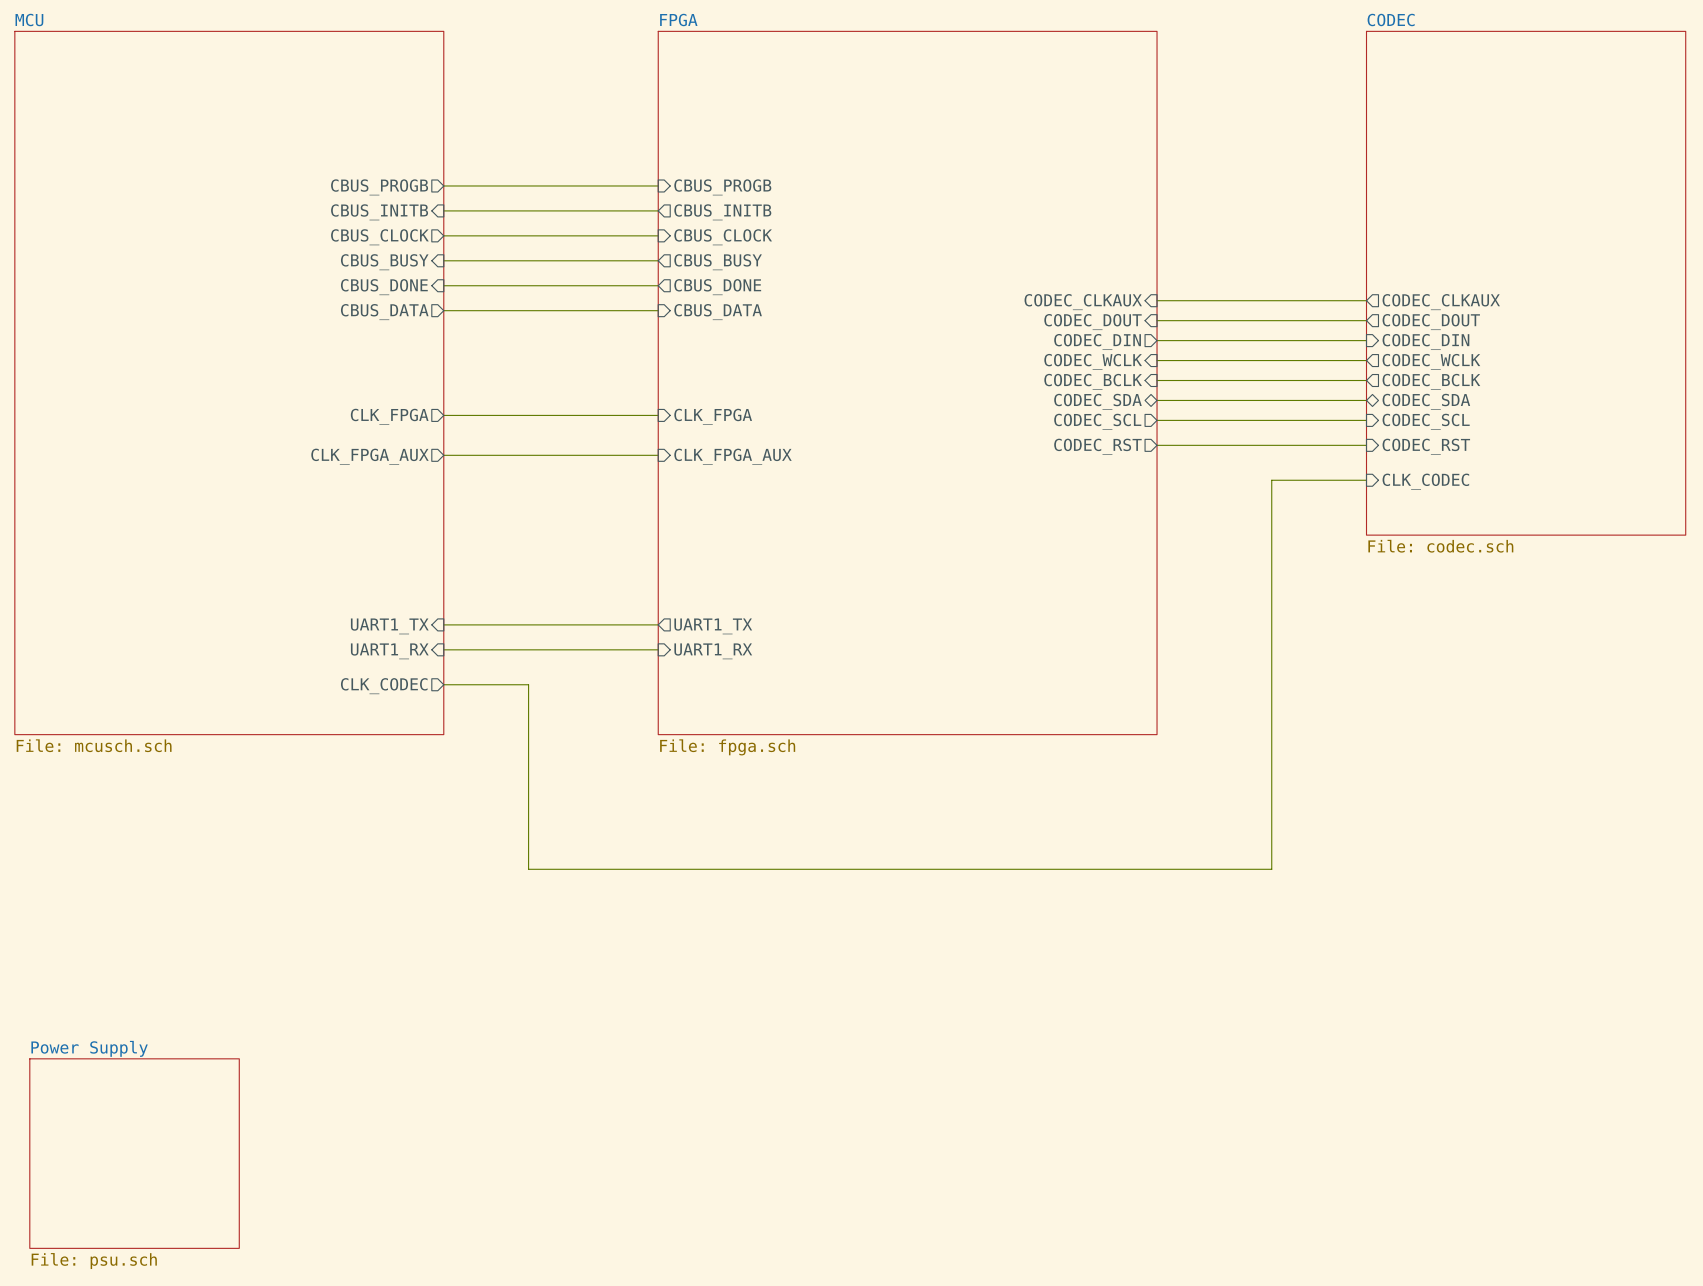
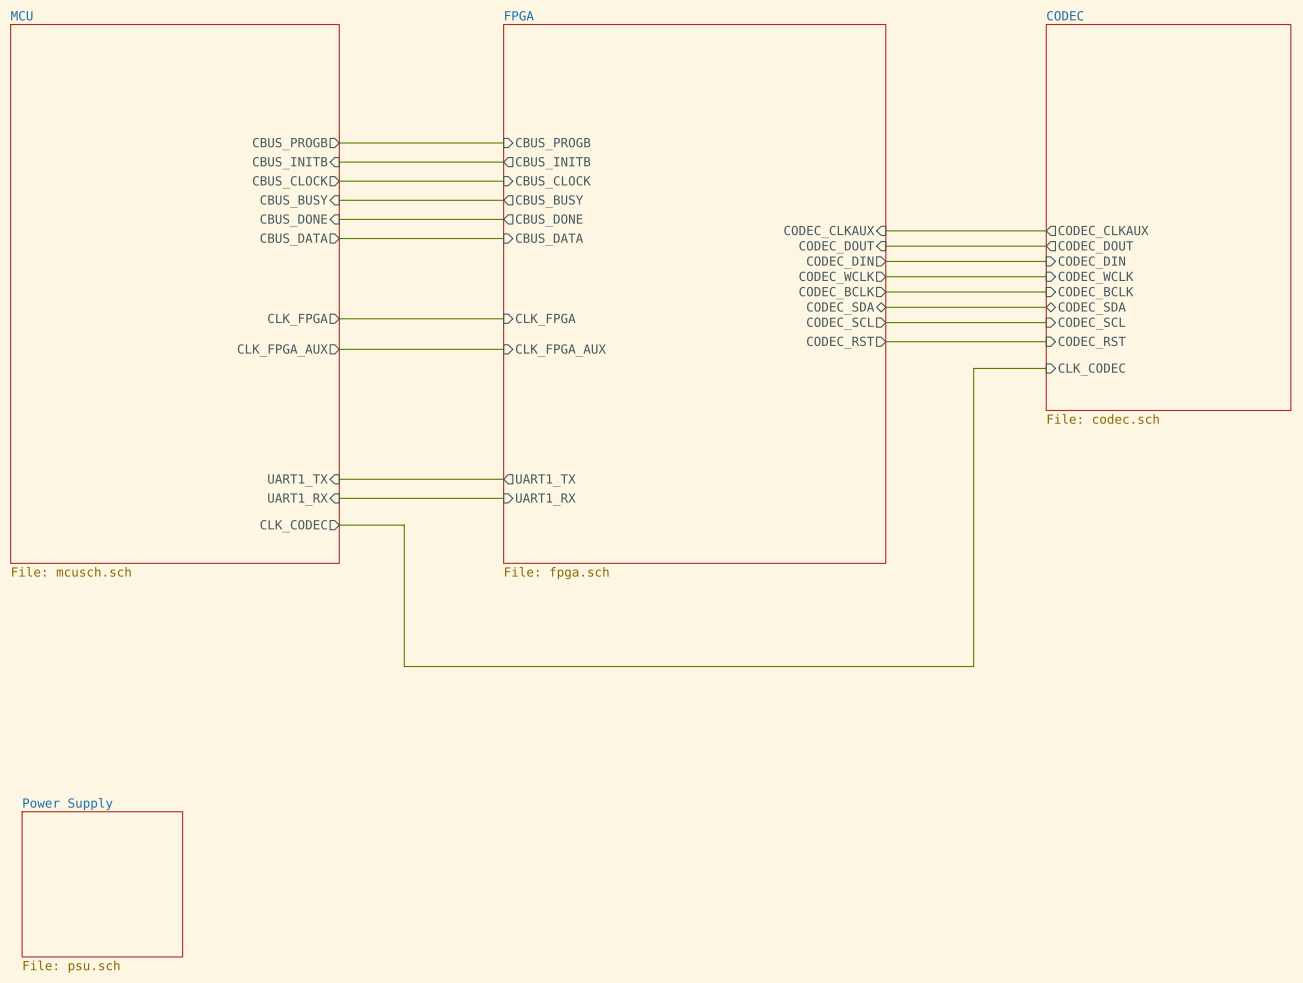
sheet pin shape: input (1093, 361) -> output (836, 277)
sheet pin shape: output (1431, 361) -> input (1096, 277)
sheet pin shape: input (1093, 381) -> output (836, 293)
sheet pin shape: output (1431, 381) -> input (1096, 293)

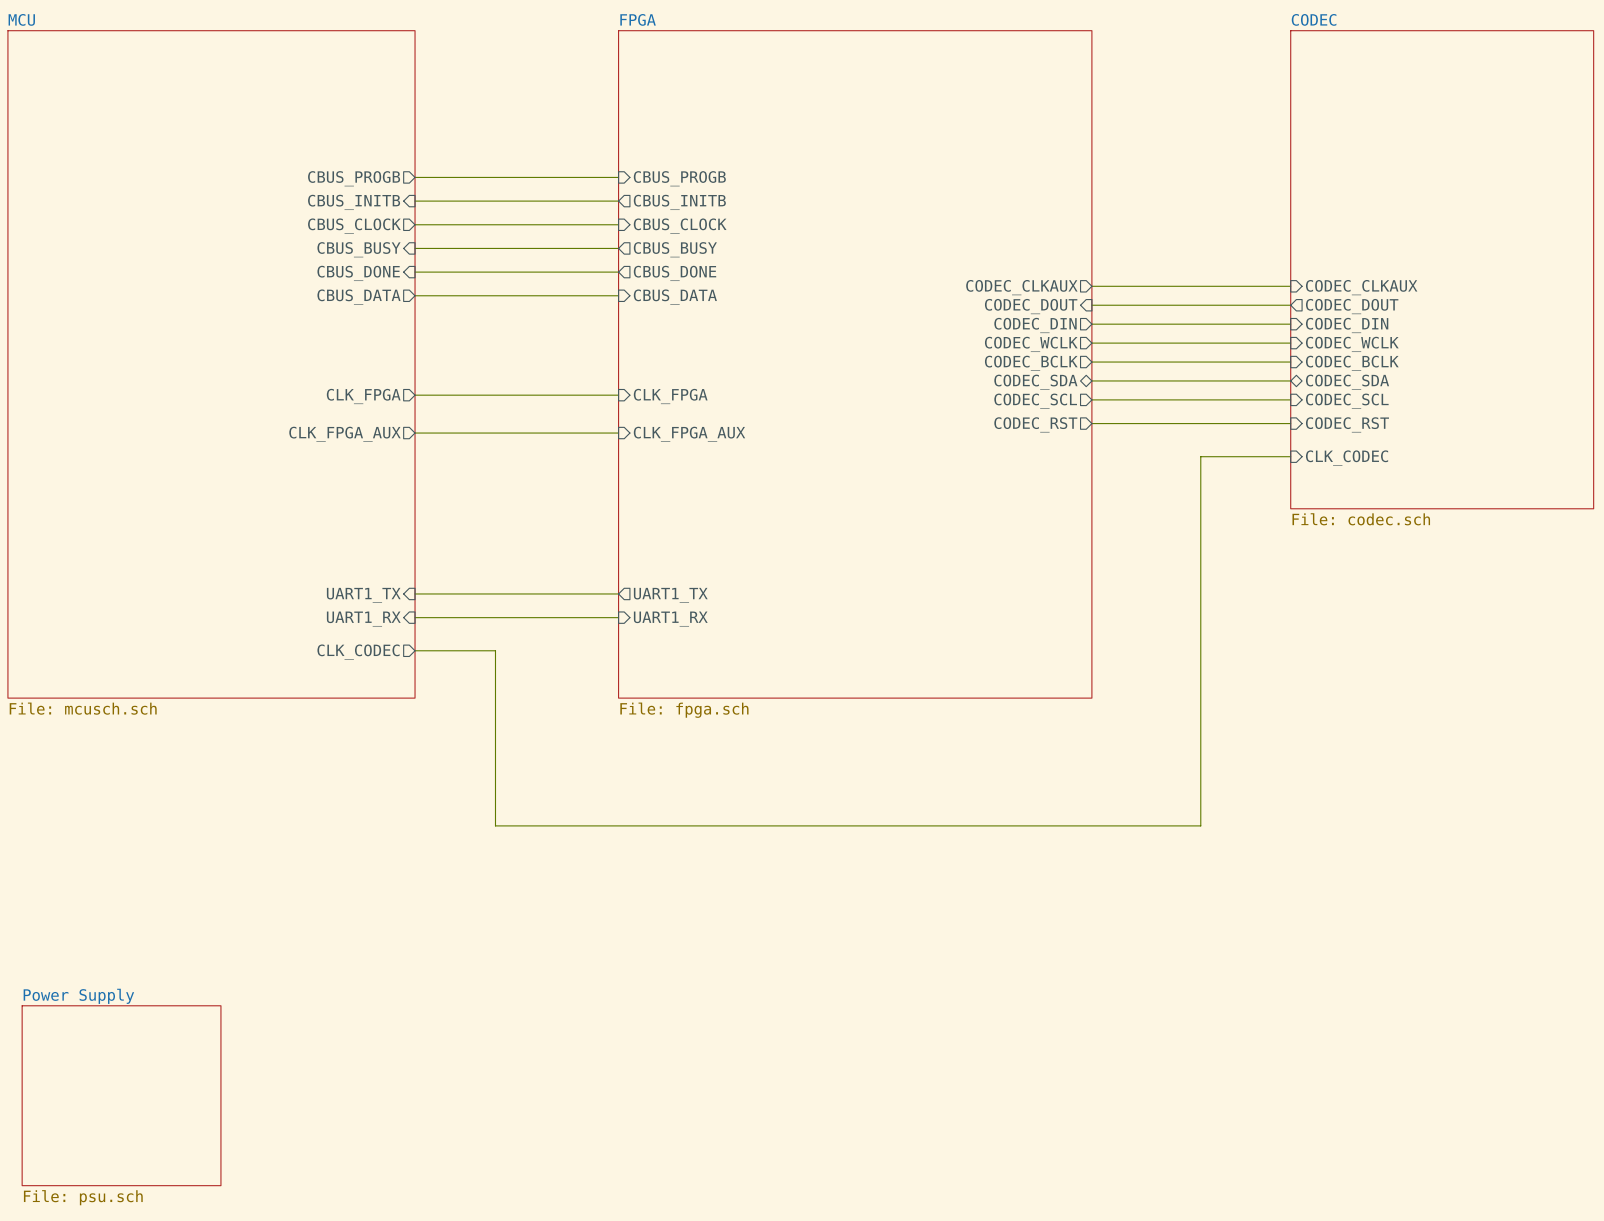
sheet pin shape: input (829, 231) -> output (1021, 287)
sheet pin shape: output (1103, 231) -> input (1361, 287)

